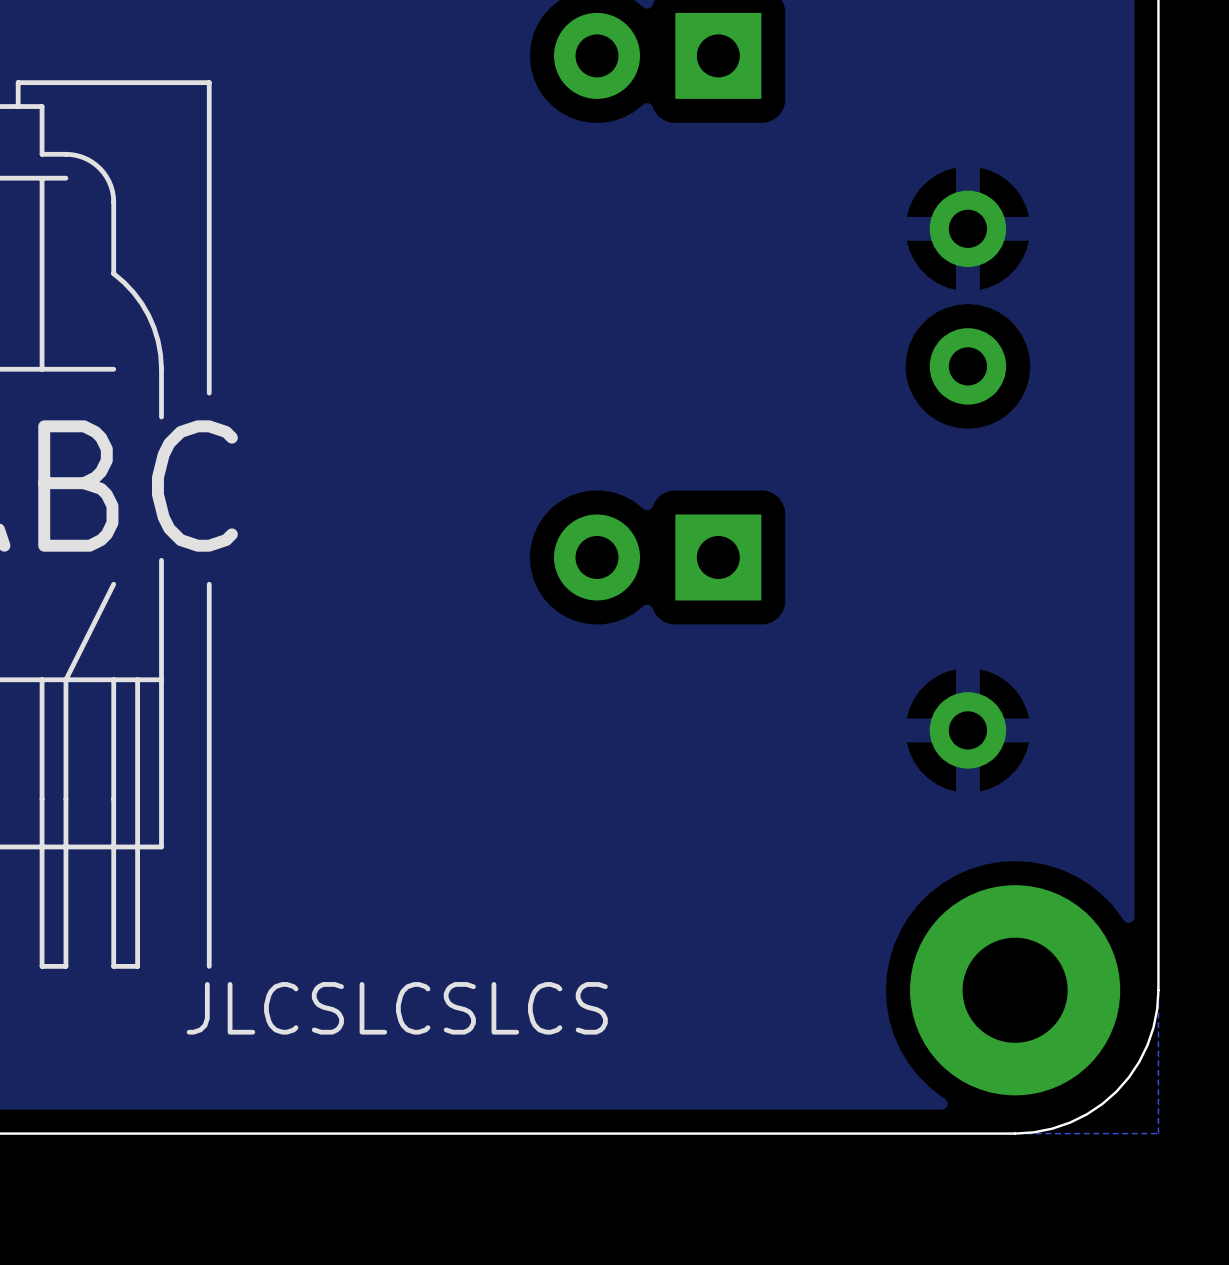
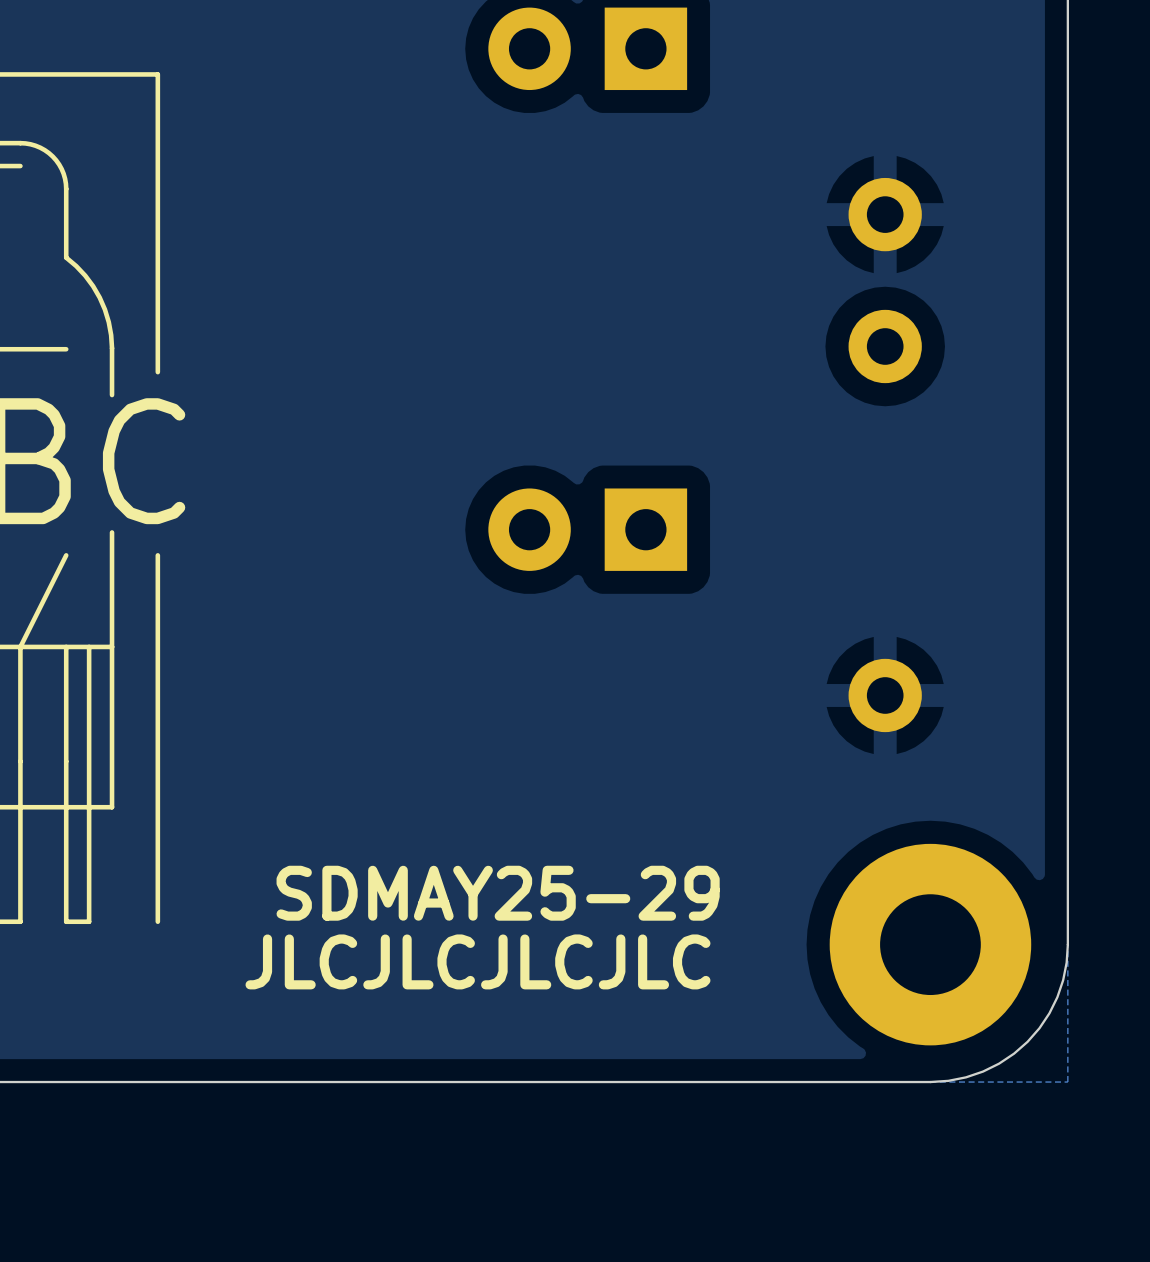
text: none -> SDMAY25-29 (498, 893)
text: JLCSLCSLCS (397, 1008) -> JLCJLCJLCJLC (477, 961)

